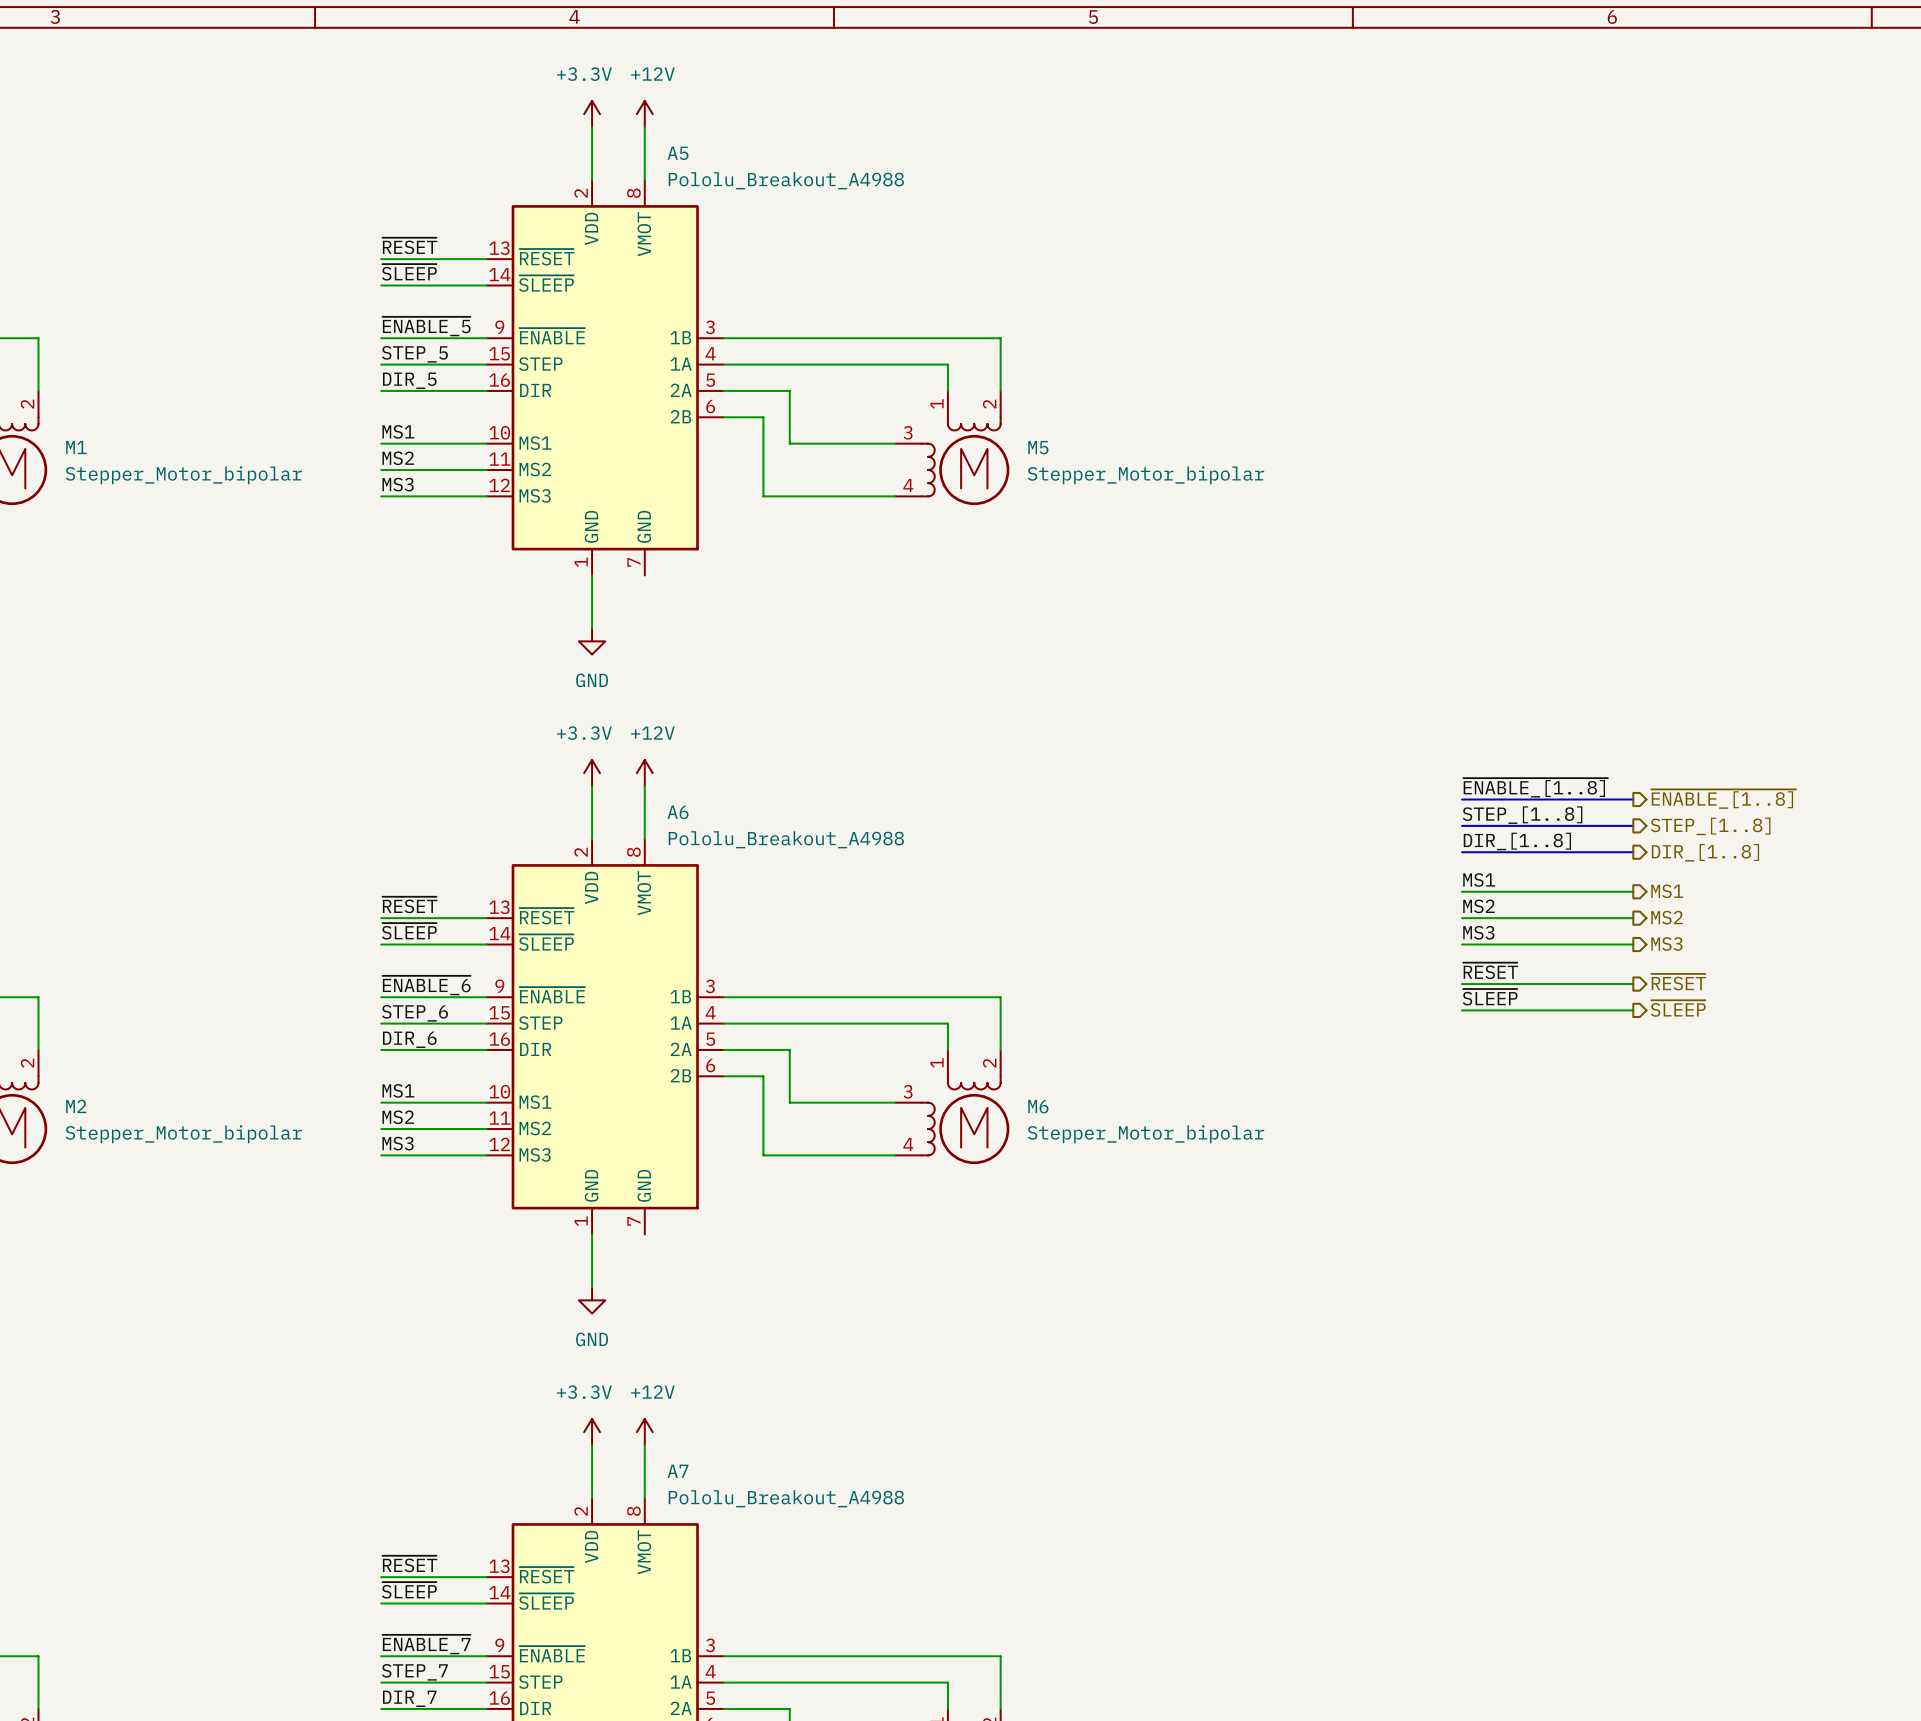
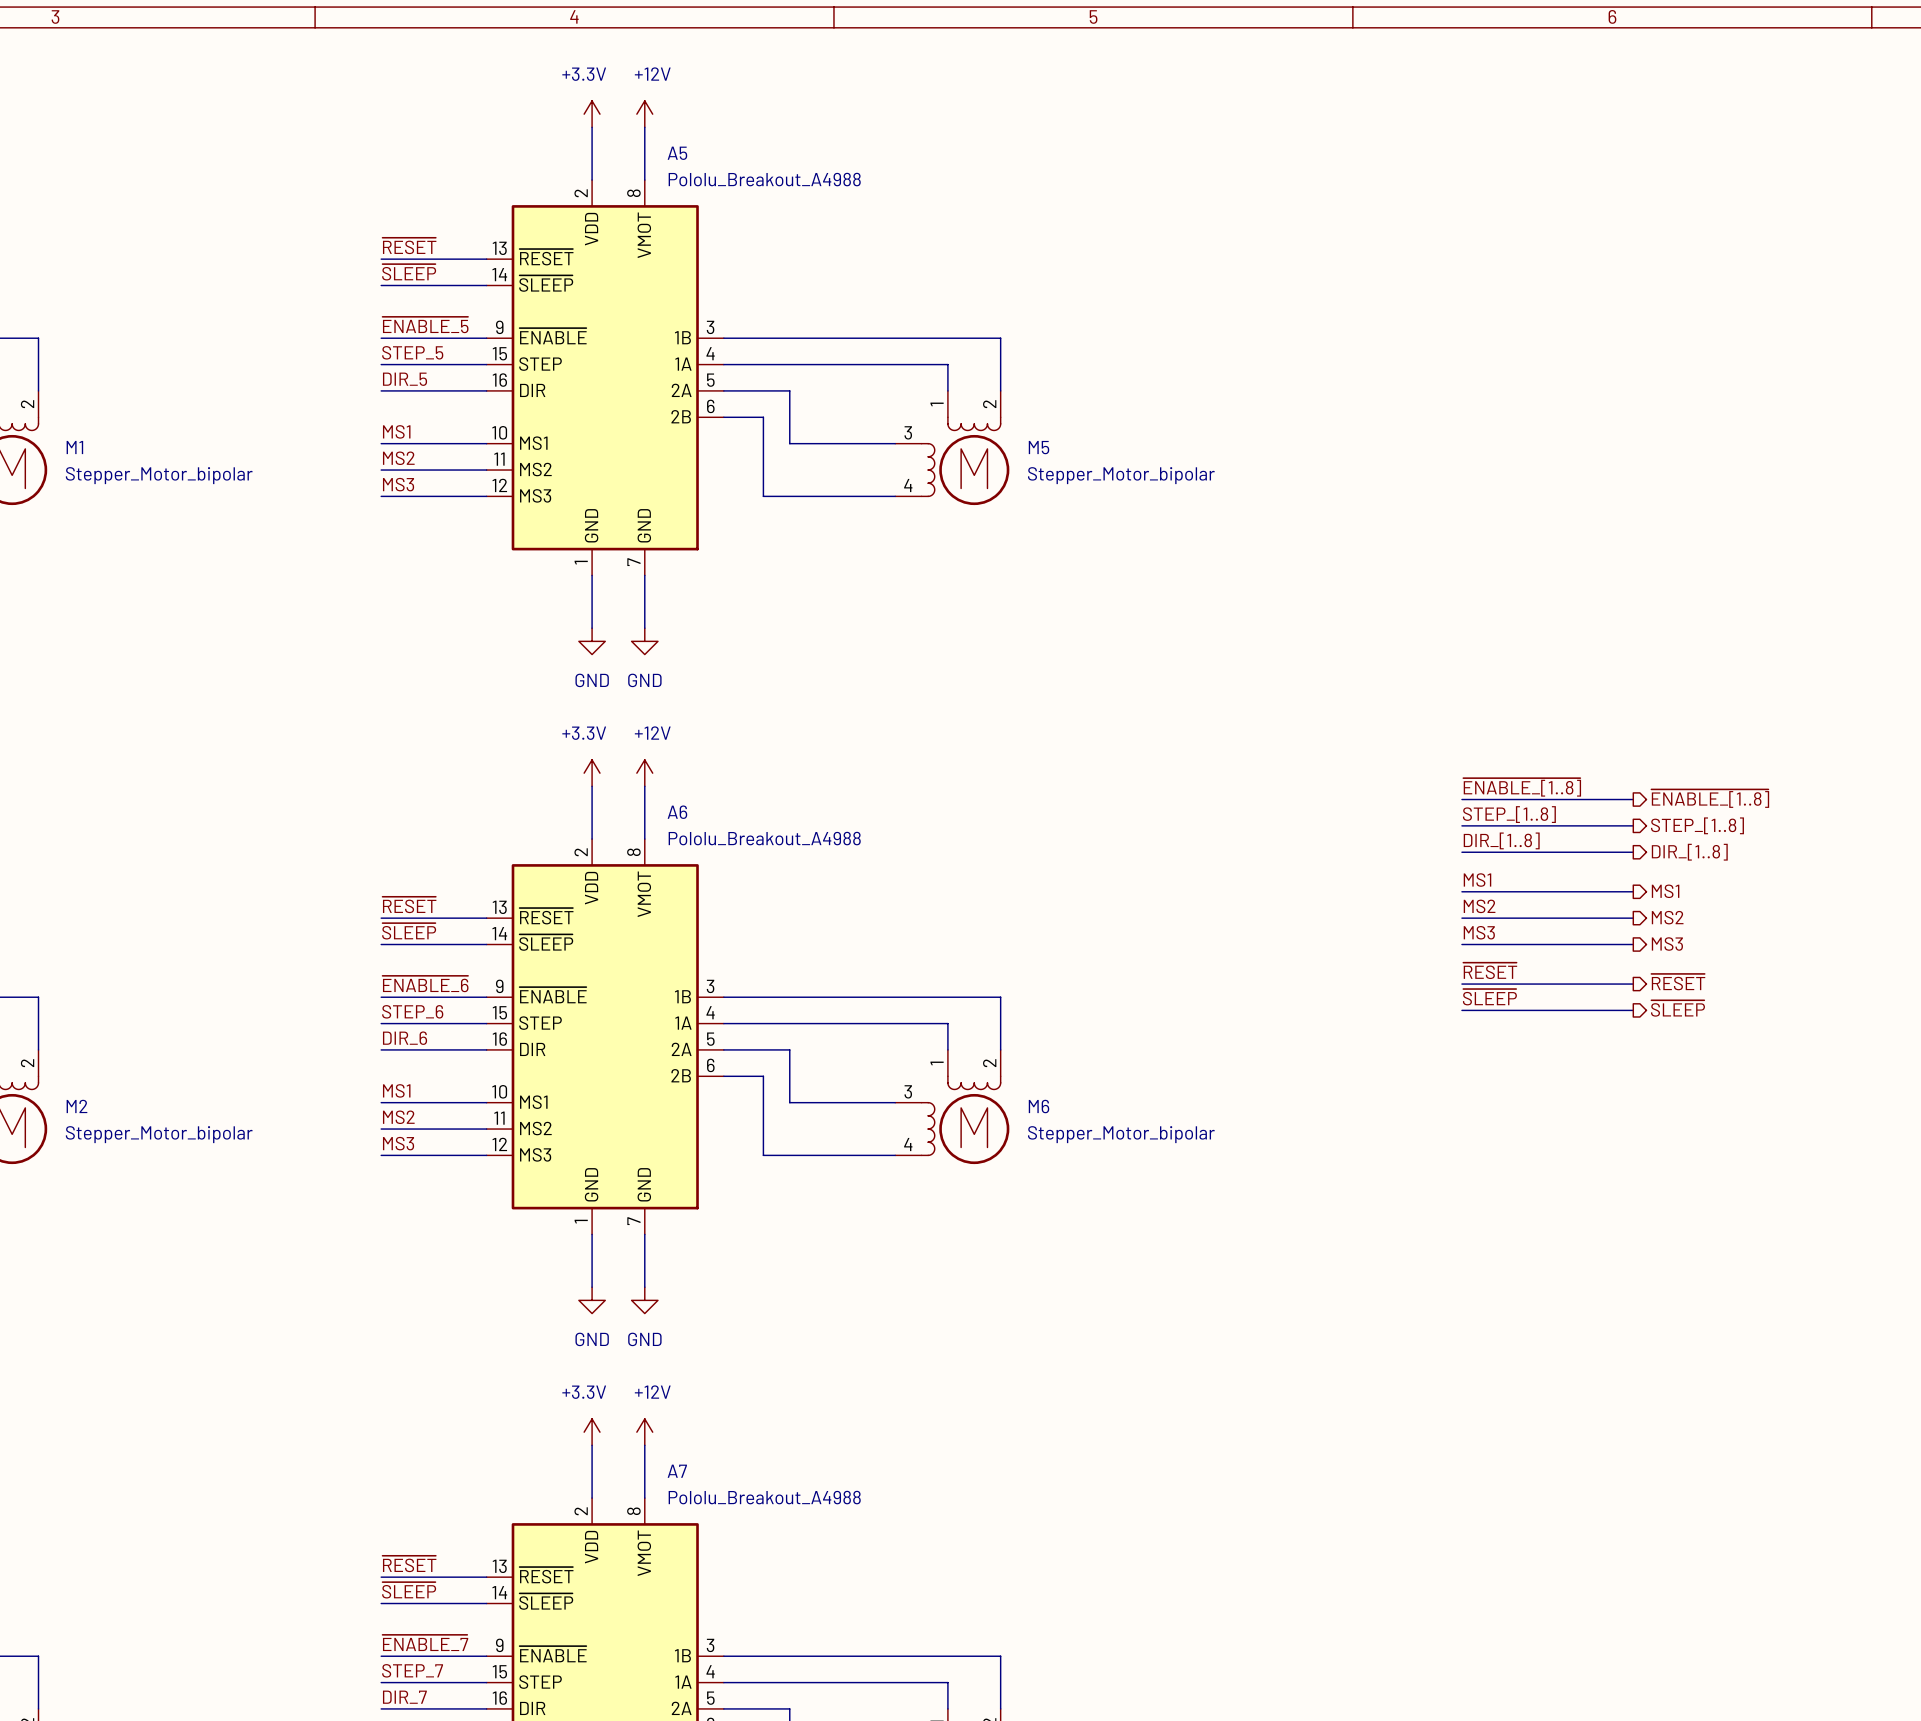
wire: none -> (644, 575) (644, 628)
power symbol: none -> GND (644, 641)
wire: none -> (644, 1234) (644, 1287)
power symbol: none -> GND (644, 1300)

